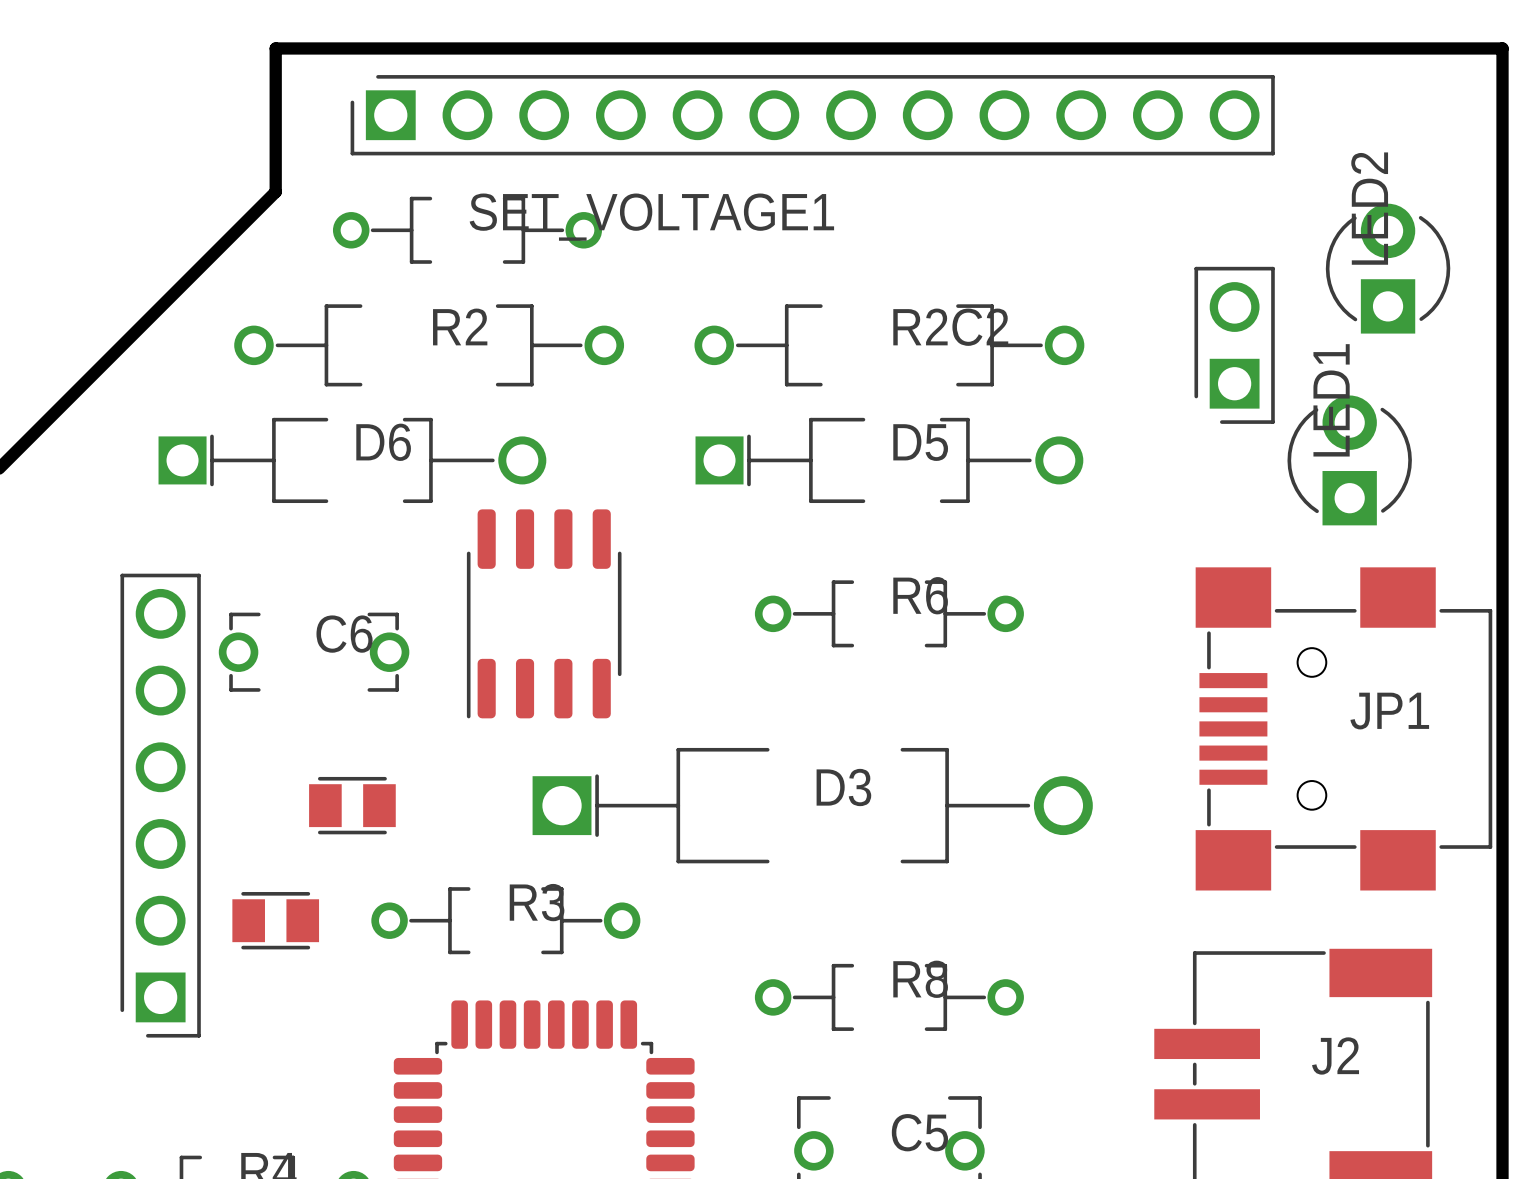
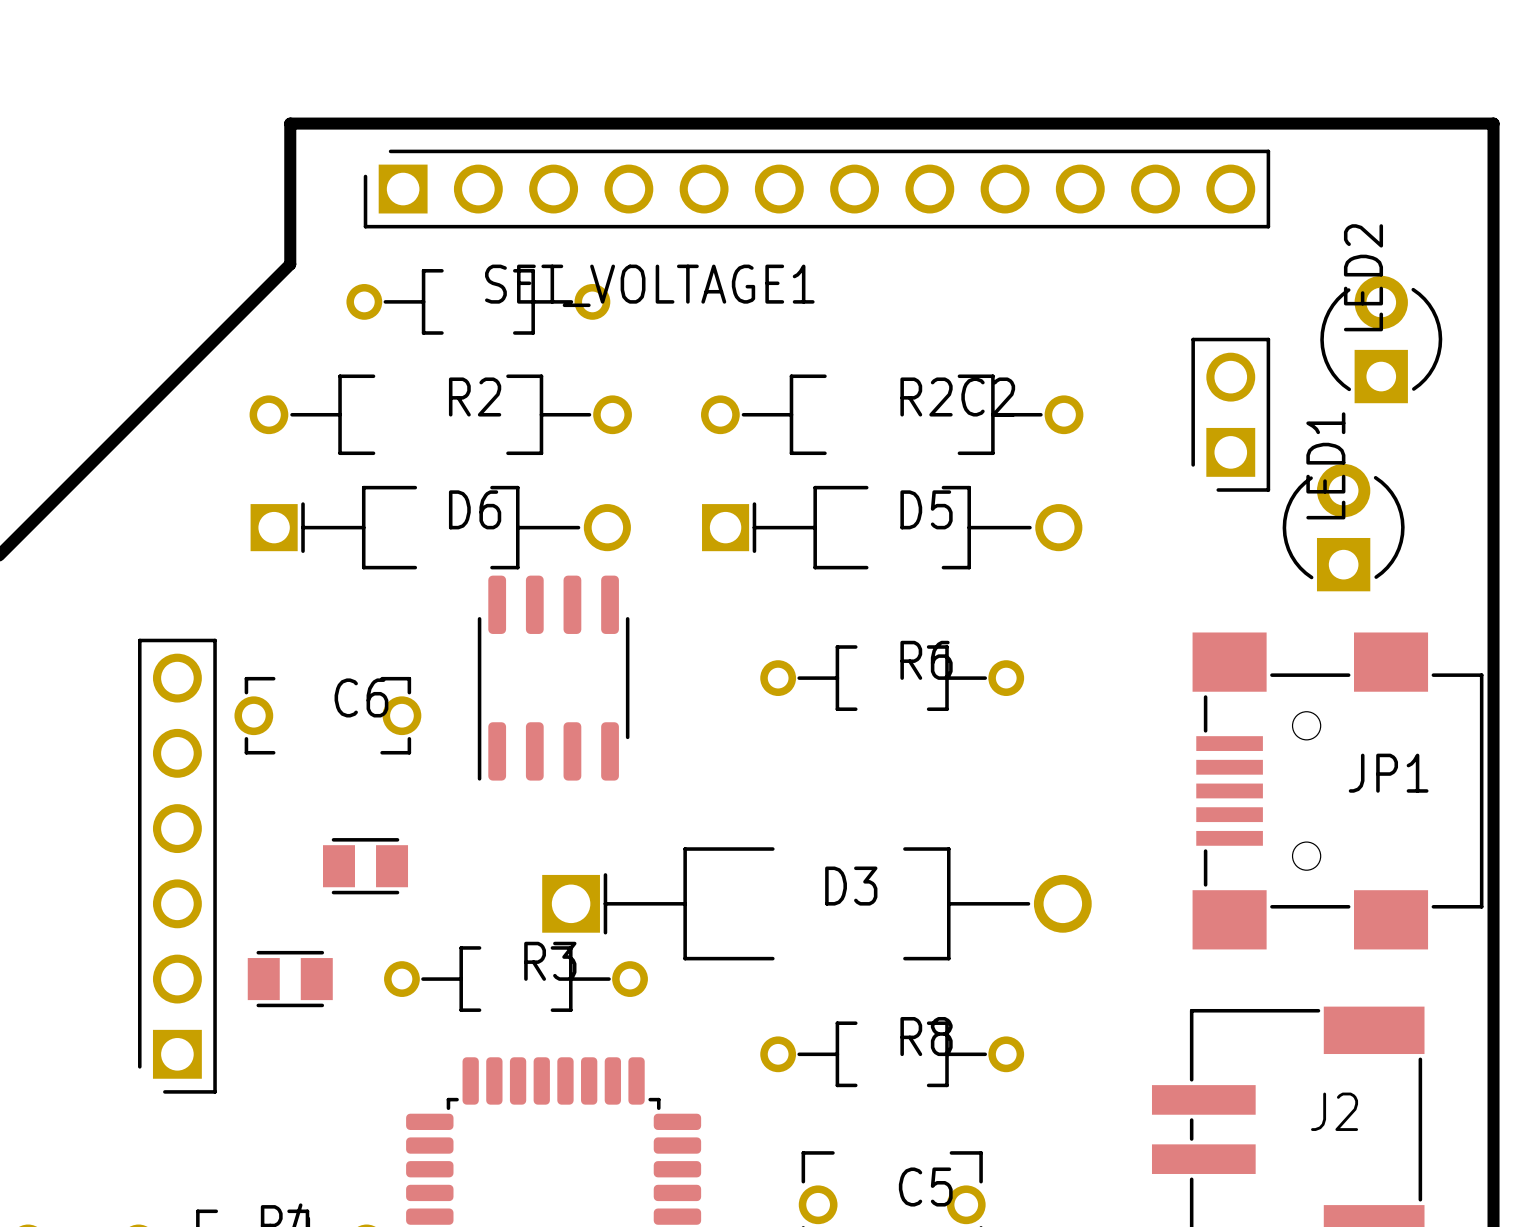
D6 position: (352, 460) -> (440, 527)
D3 position: (812, 805) -> (816, 903)

